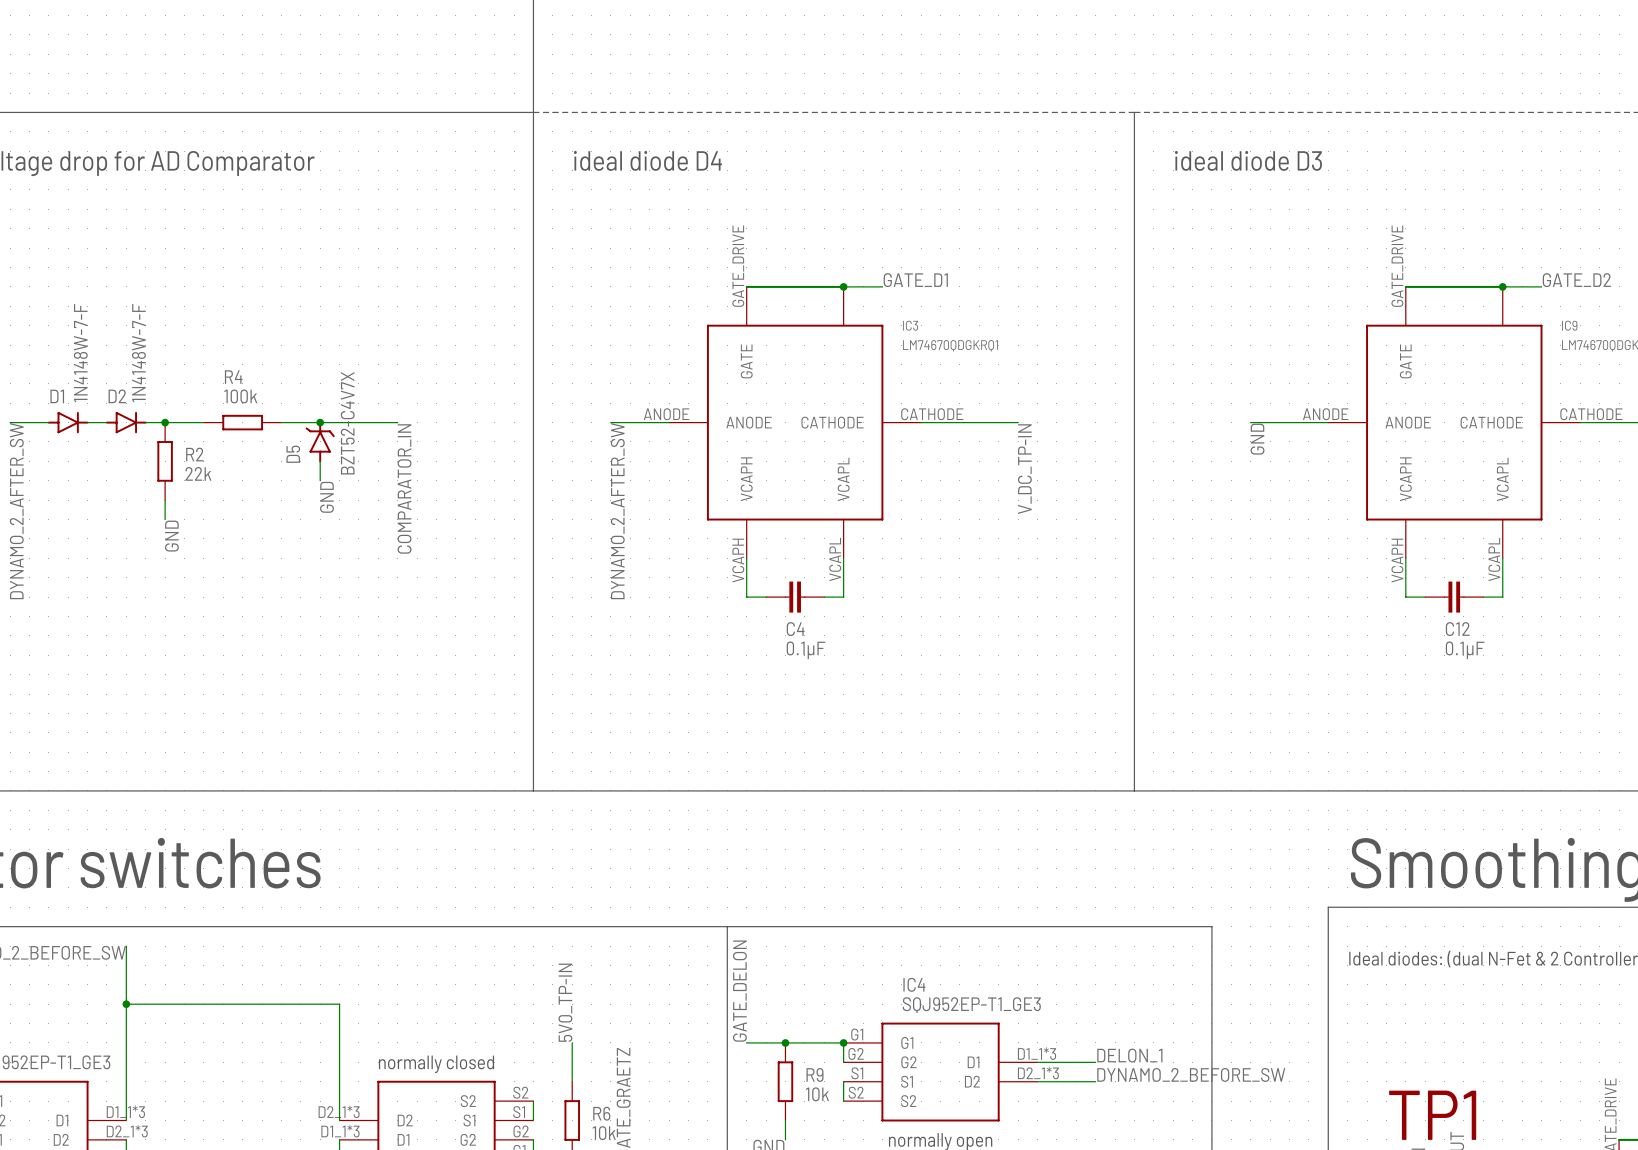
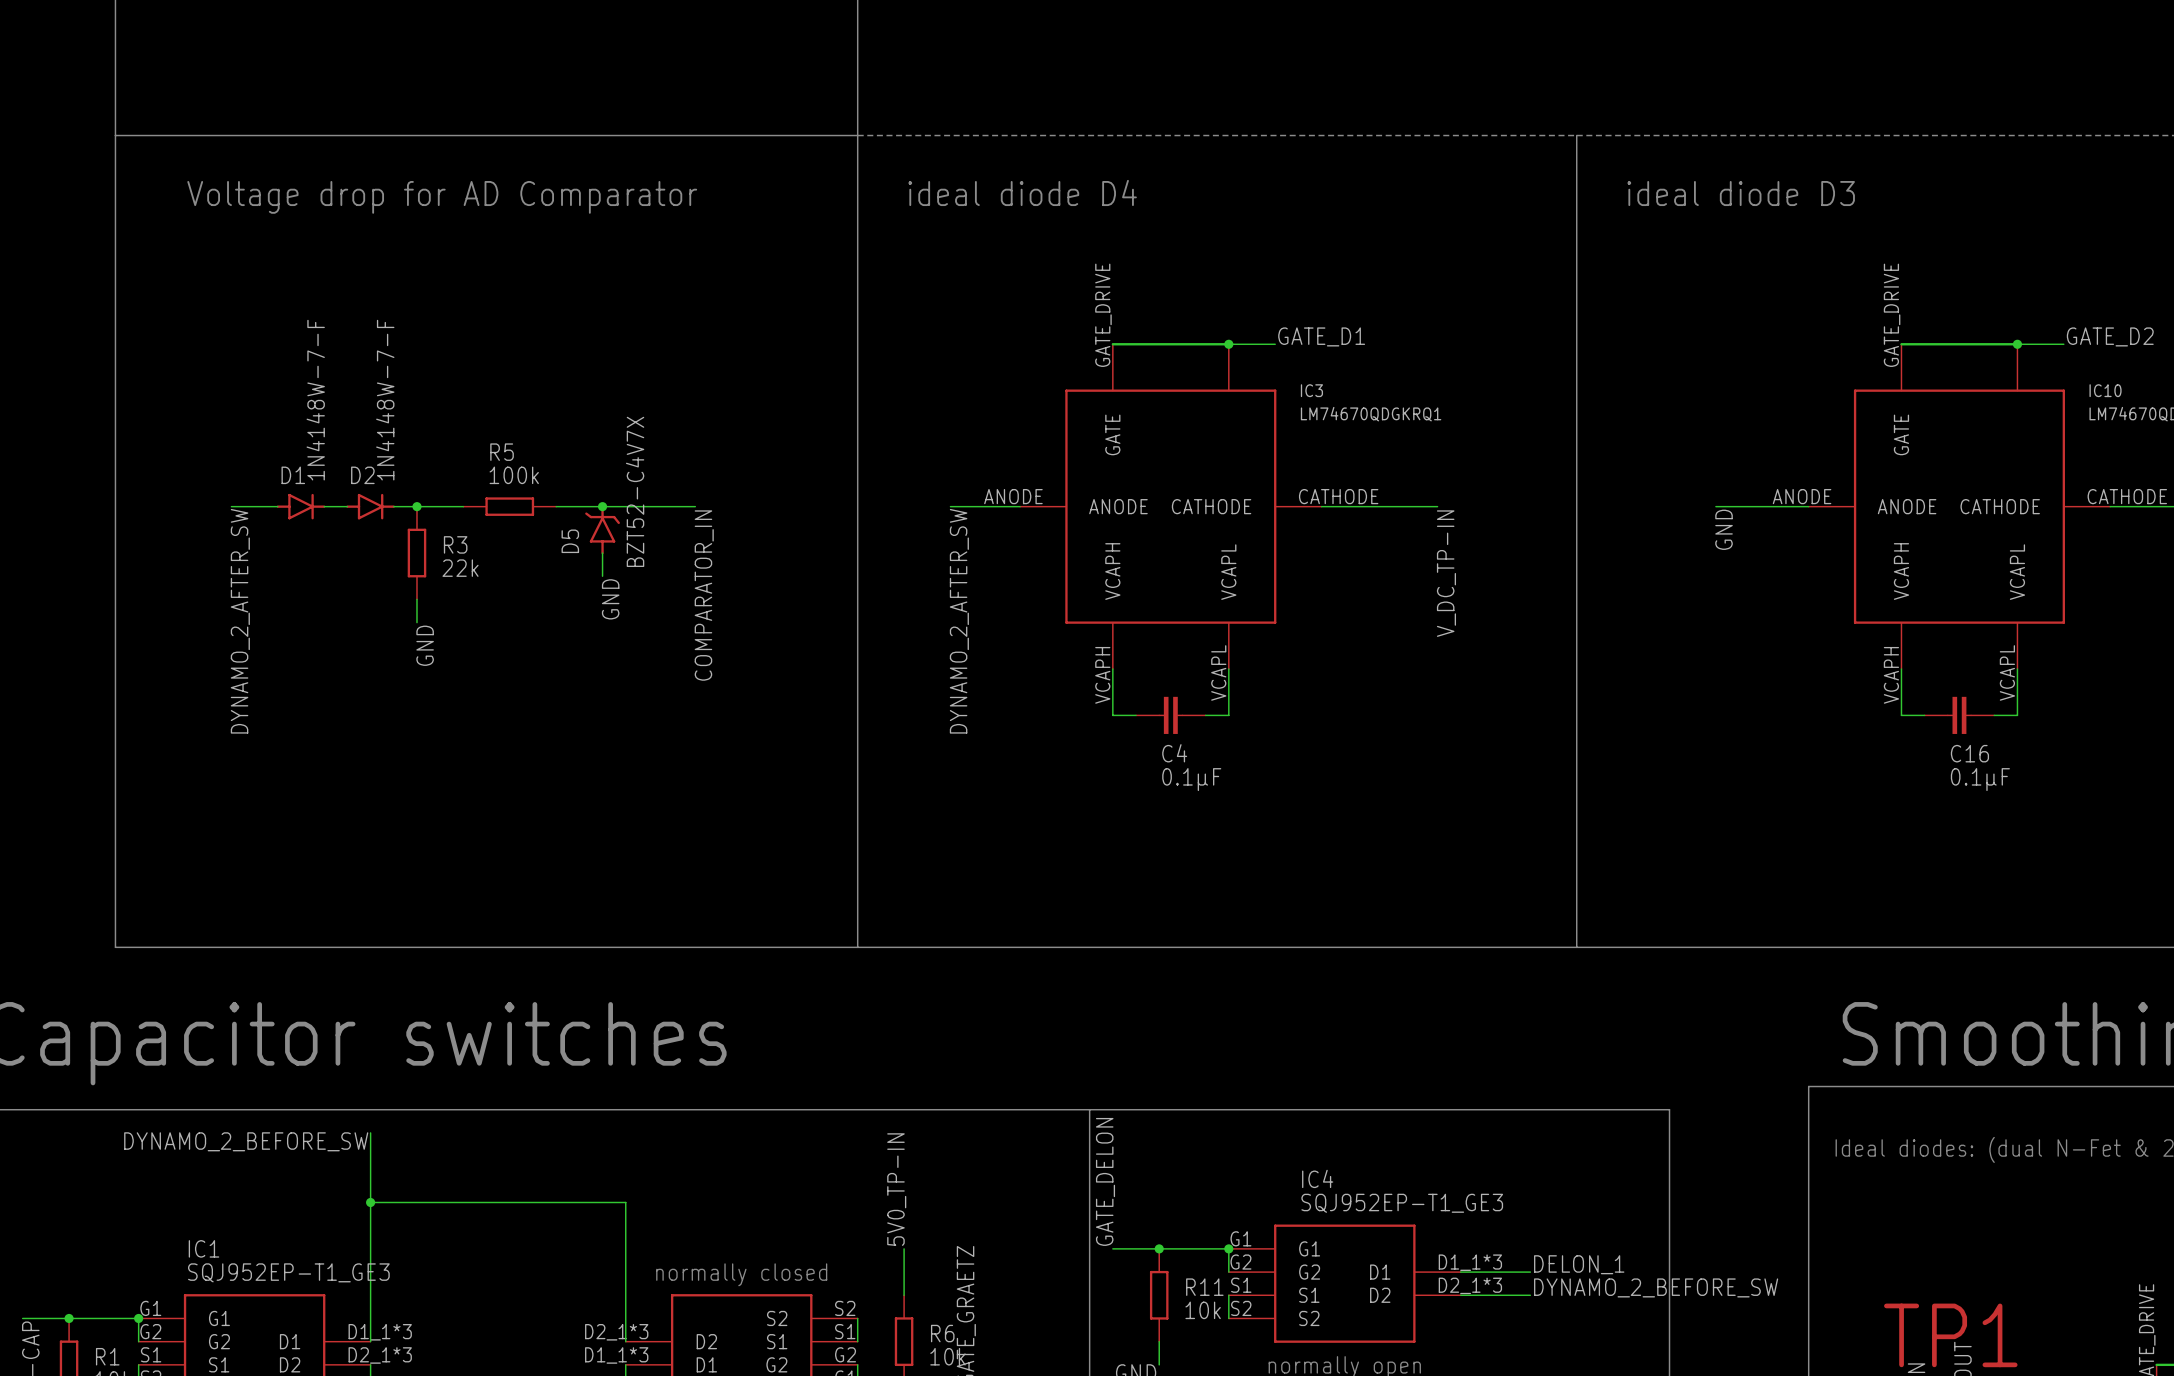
IC9 name: IC9 (1569, 325) -> IC10 (2105, 390)
R4 name: R4 (233, 377) -> R5 (502, 452)
R2 name: R2 (194, 454) -> R3 (455, 544)
C12 name: C12 (1457, 629) -> C16 (1969, 753)
R9 name: R9 (814, 1074) -> R11 (1204, 1287)

